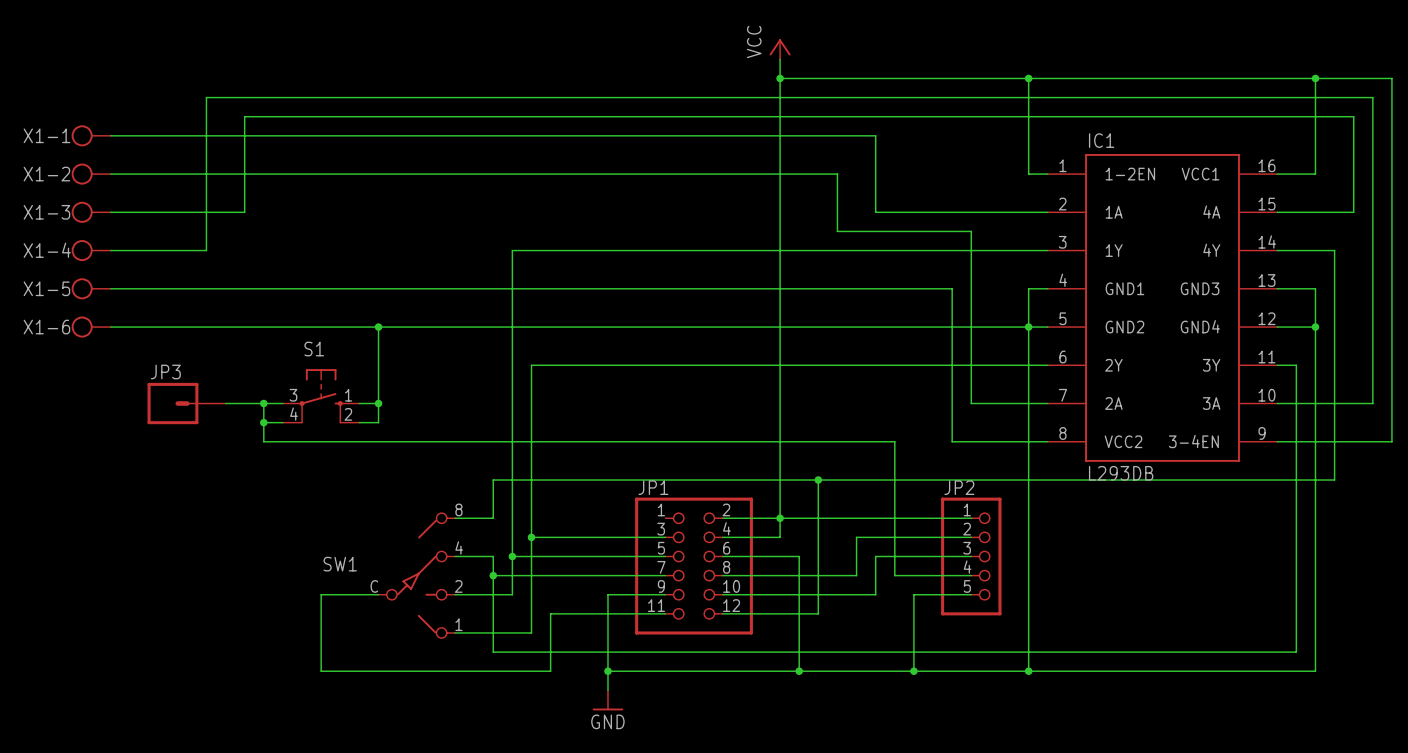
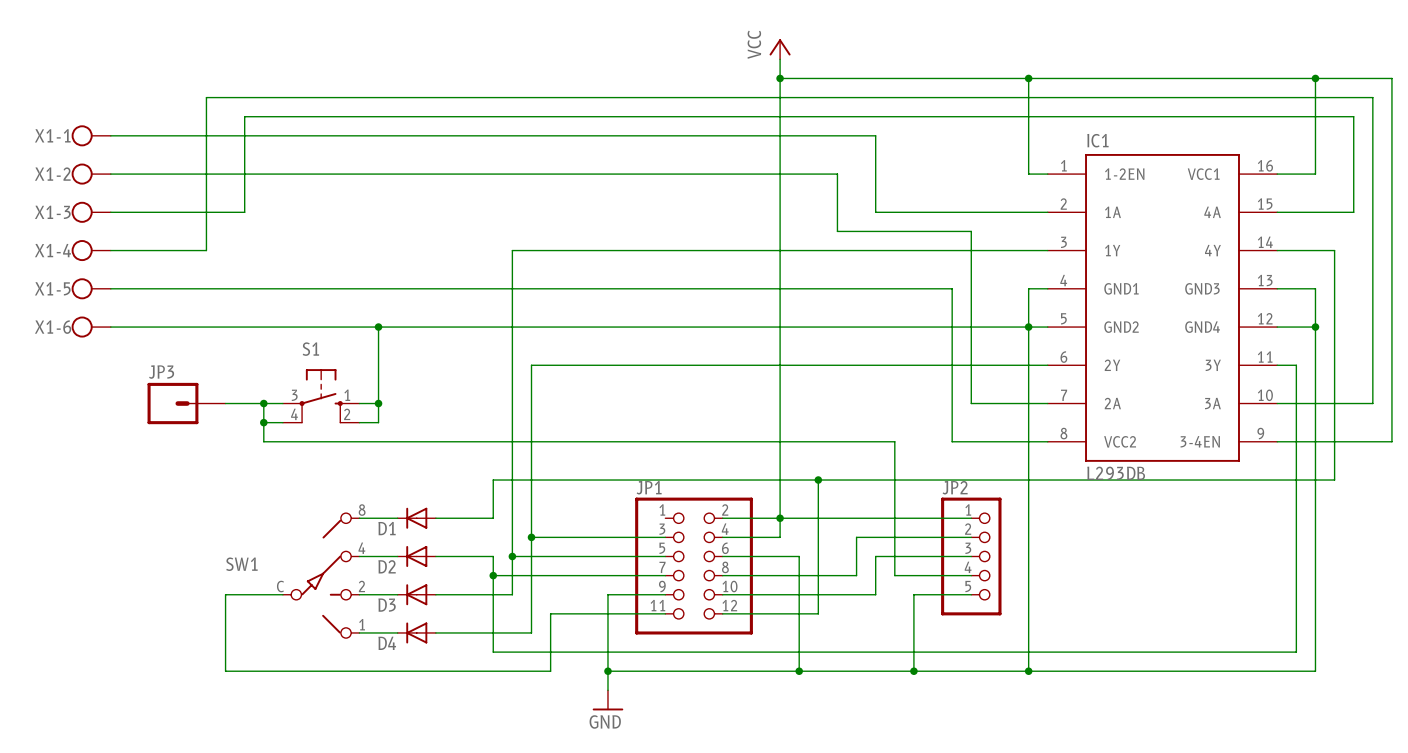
wire: none -> (359, 518) (397, 518)
D1: none -> (416, 518)
wire: none -> (359, 556) (397, 556)
D2: none -> (416, 556)
SW1 position: (416, 575) -> (321, 575)
wire: (359, 594) (321, 594) (321, 671) -> (282, 594) (225, 594) (225, 671) (321, 671)
D3: none -> (416, 594)
wire: none -> (359, 632) (397, 632)
D4: none -> (416, 632)

